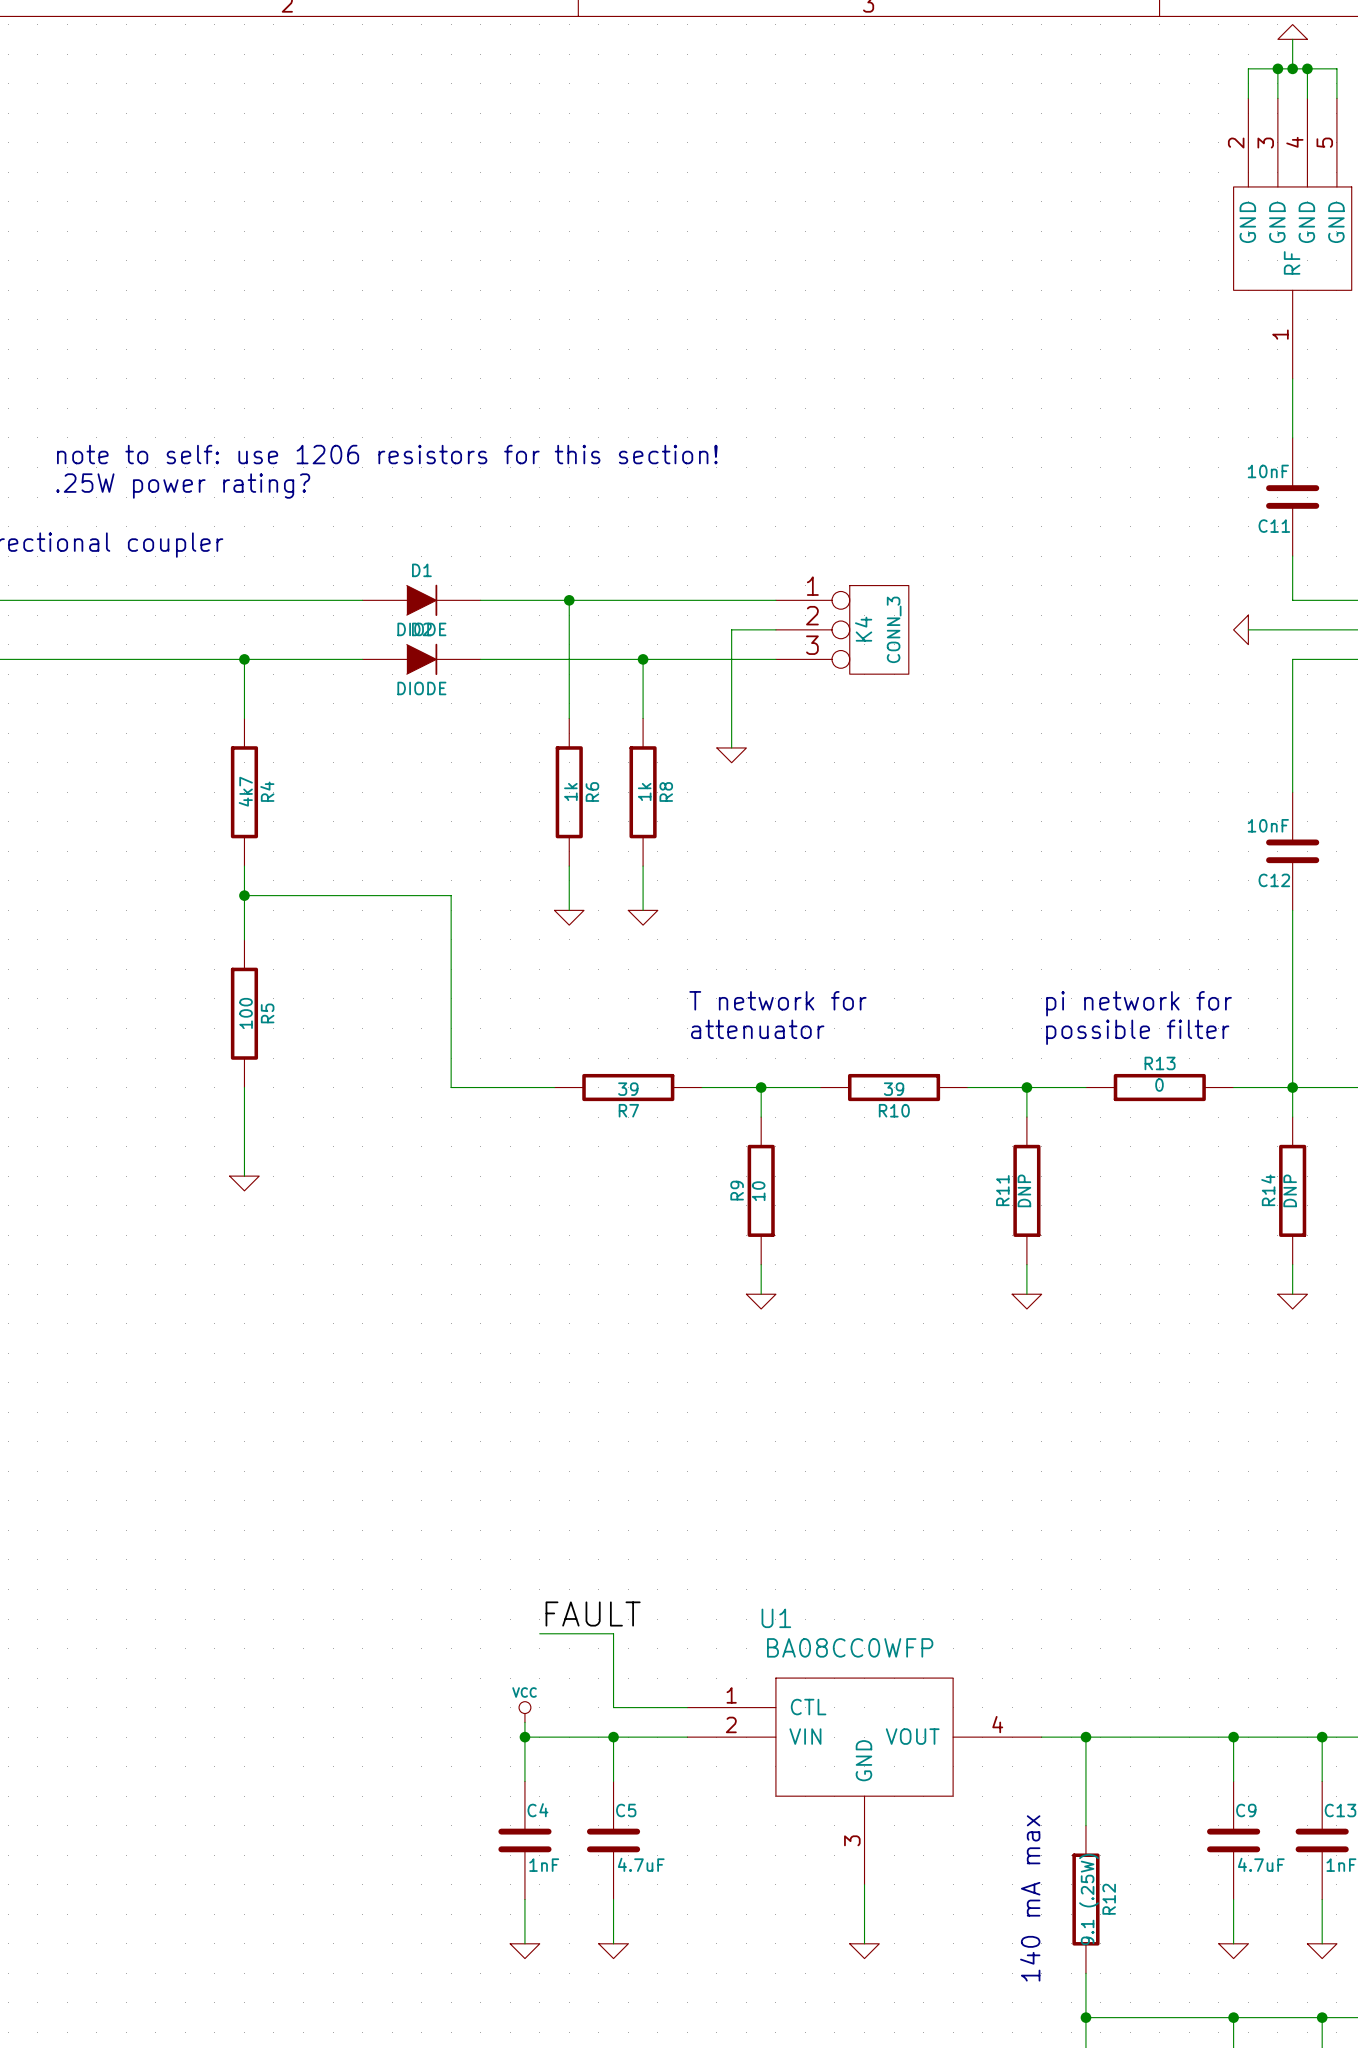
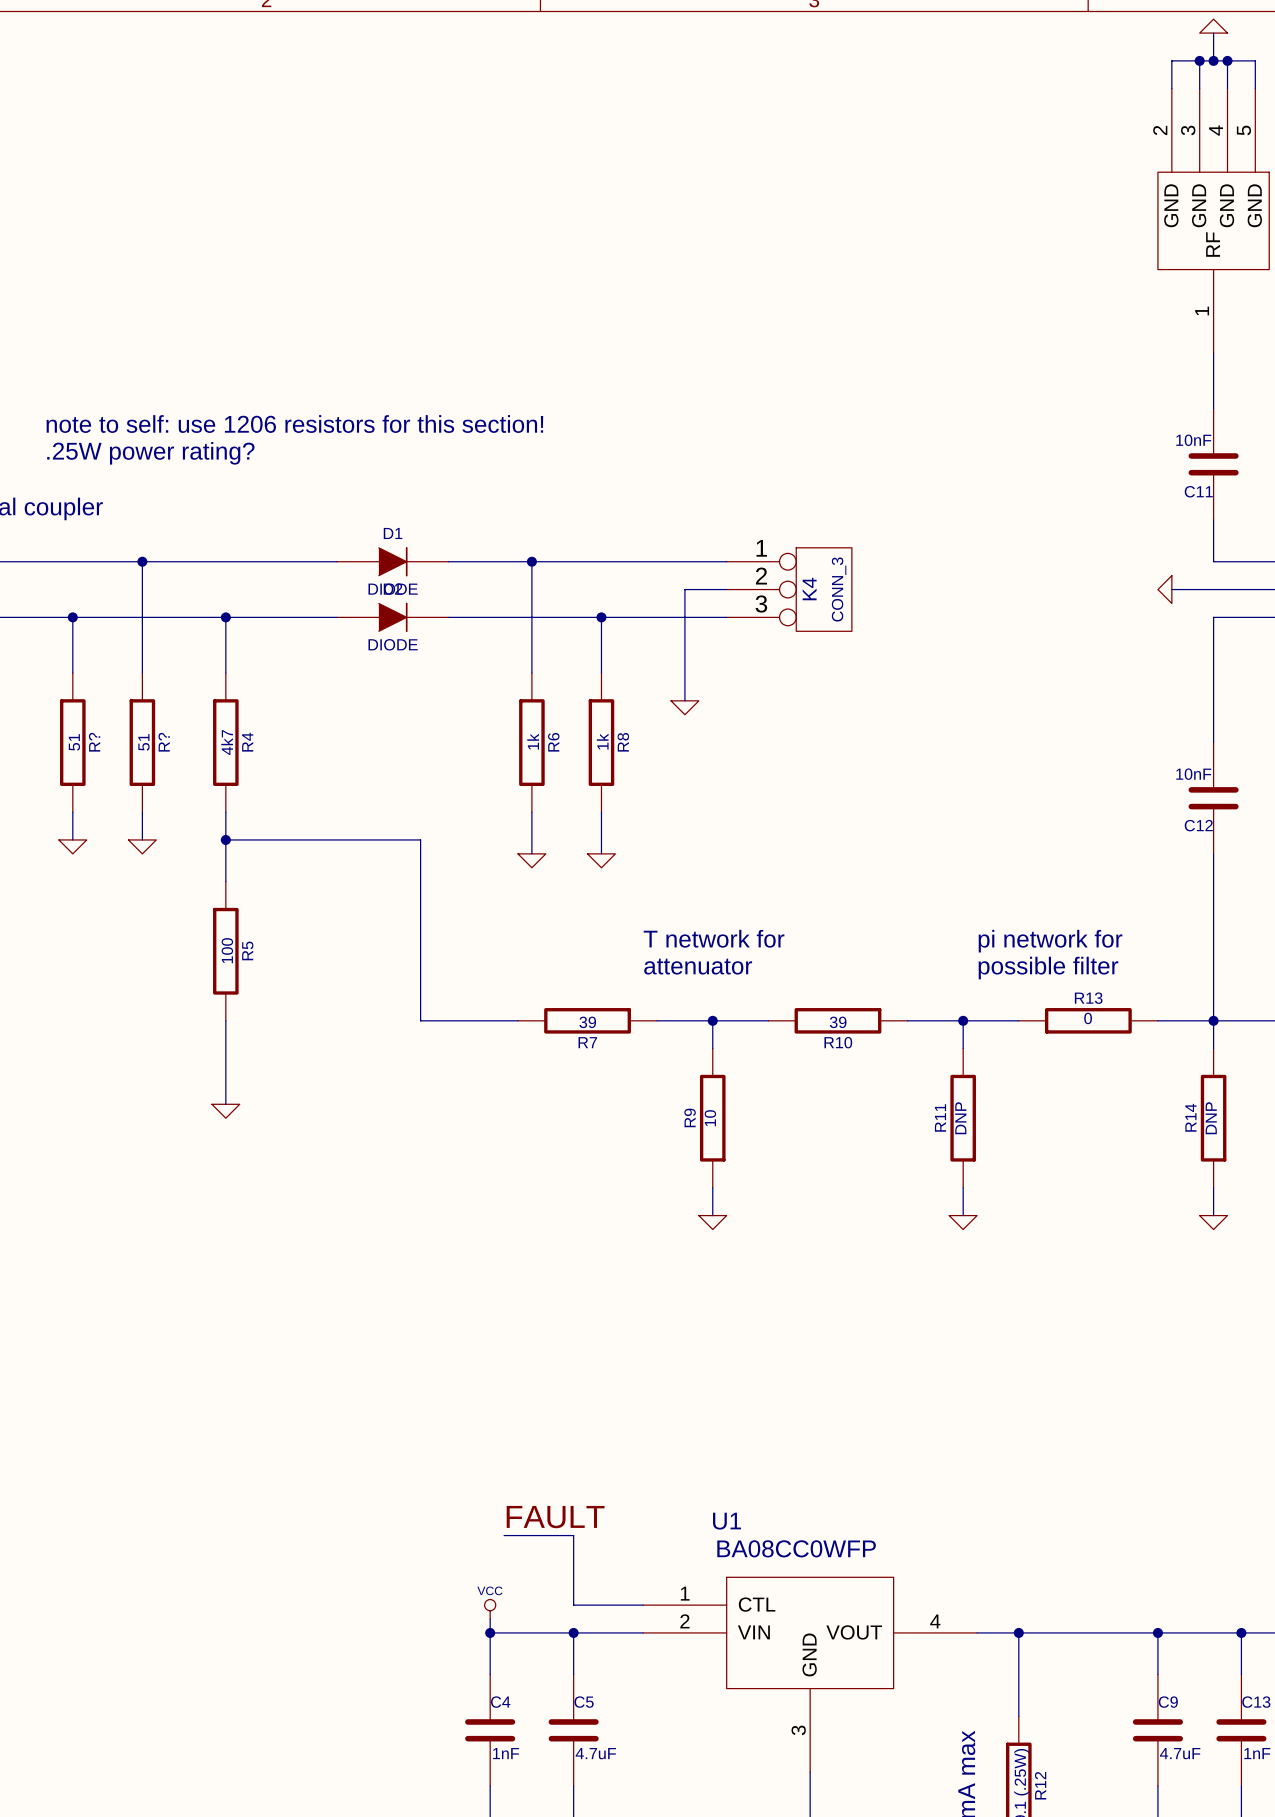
wire: none -> (142, 561) (142, 673)
junction: none -> (142, 561)
wire: none -> (72, 617) (72, 673)
junction: none -> (72, 617)
R?: none -> 51 (72, 742)
R?: none -> 51 (142, 742)
wire: none -> (72, 812) (72, 839)
wire: none -> (142, 812) (142, 839)
power symbol: none -> (72, 846)
power symbol: none -> (142, 846)

